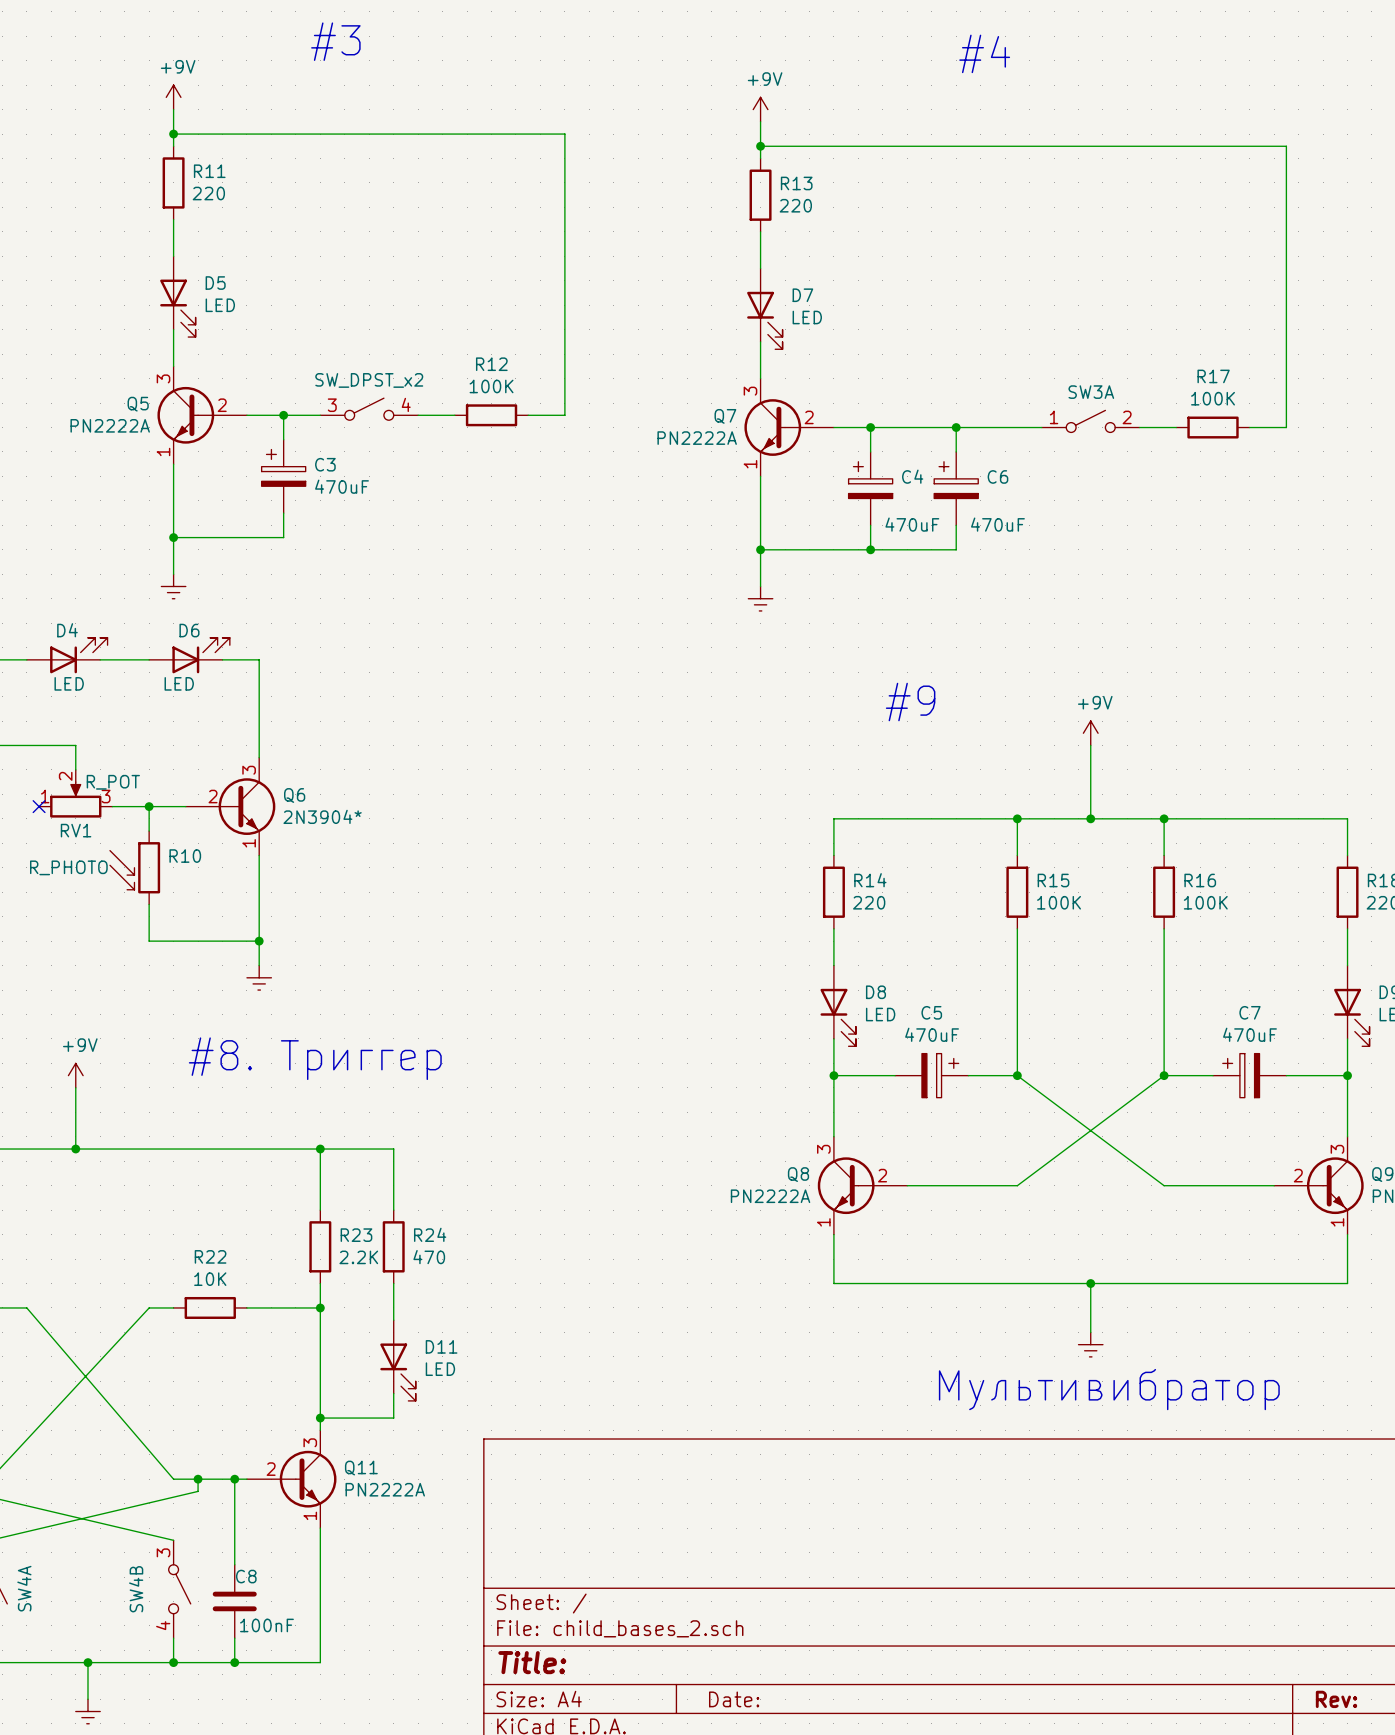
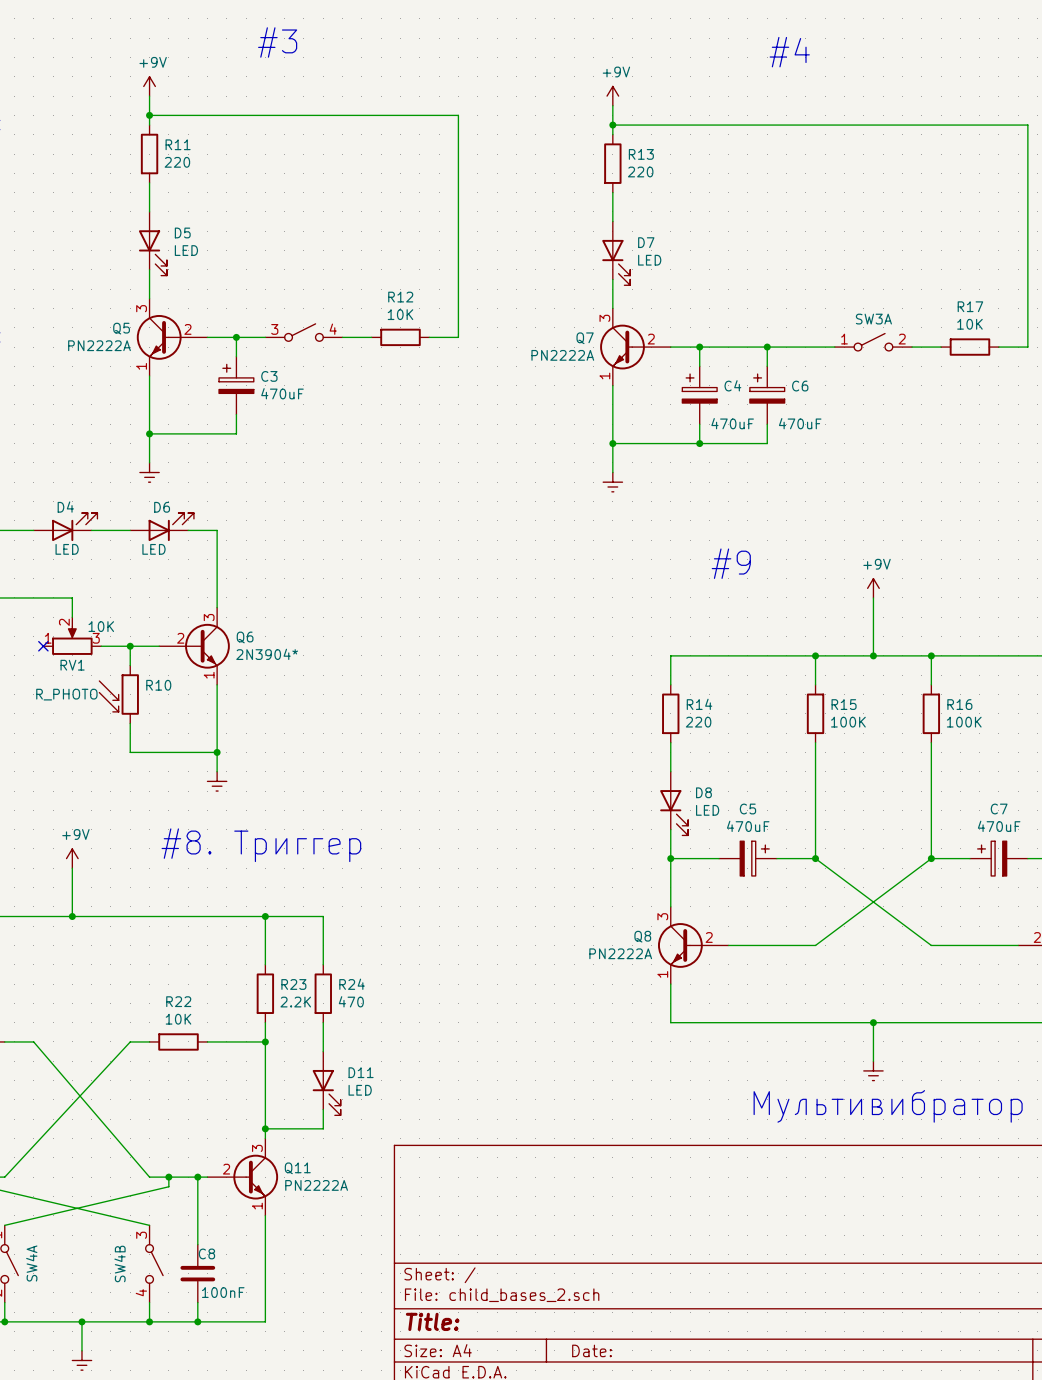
part value: SW_DPST_x2 (369, 380) -> none
R12 value: 100K (491, 386) -> 10K (400, 314)
R17 value: 100K (1213, 398) -> 10K (969, 324)
RV1 value: R_POT (113, 782) -> 10K (101, 626)

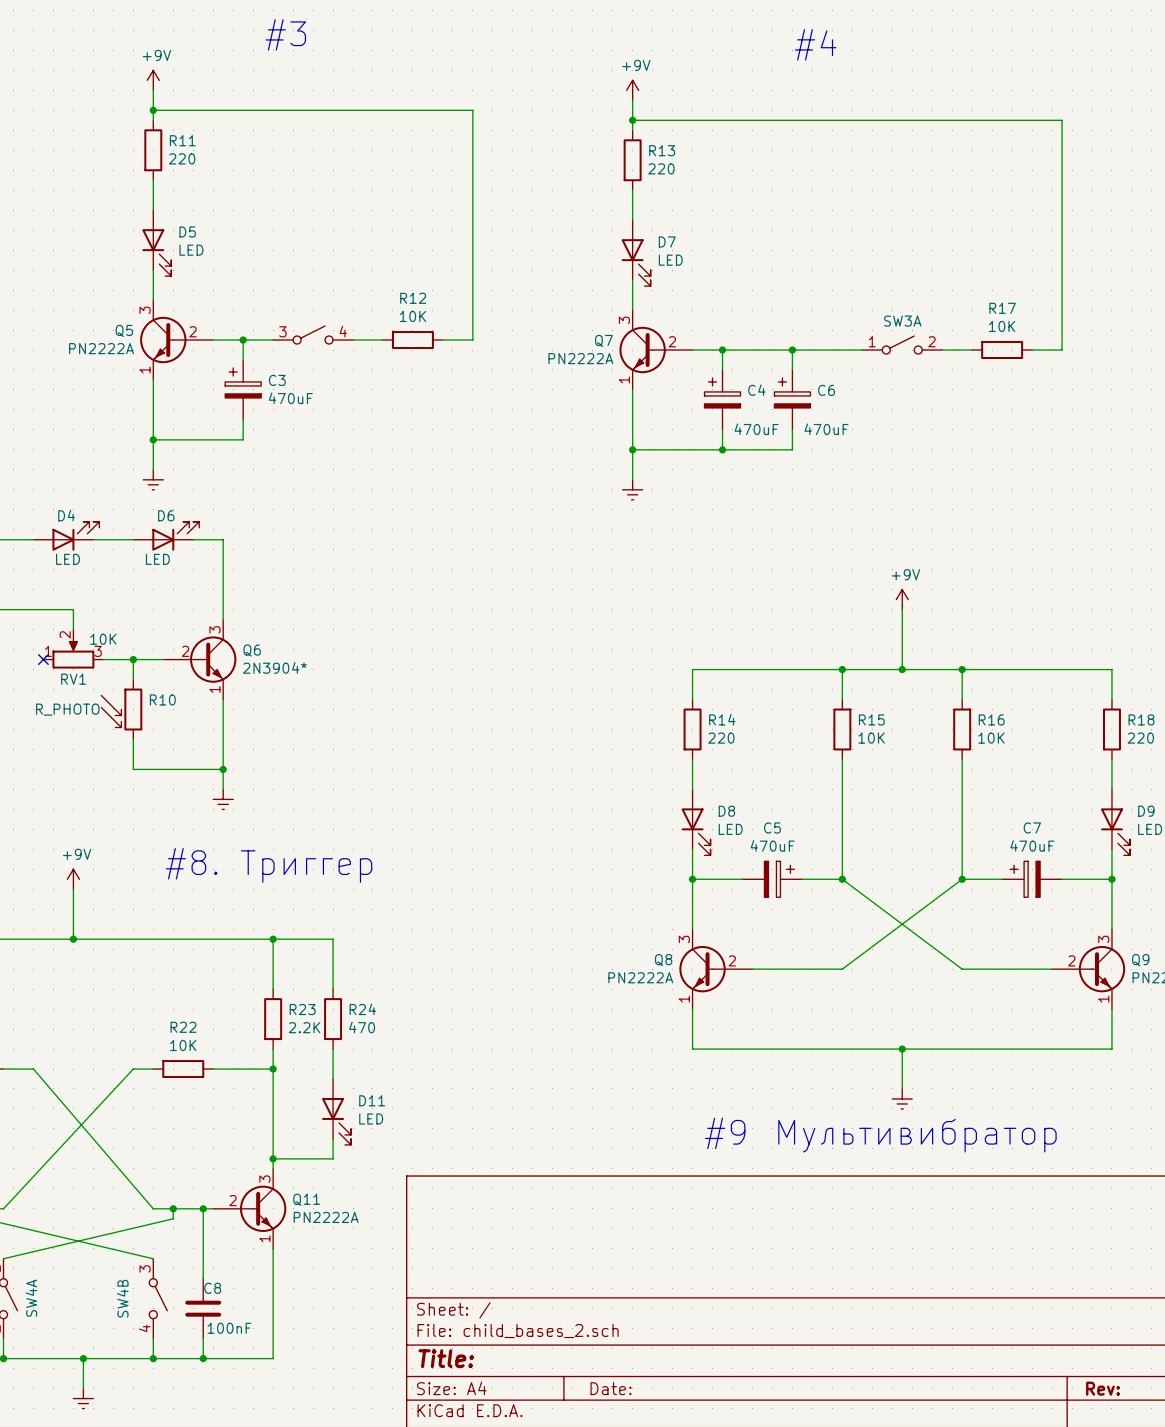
text: #9 (731, 563) -> none
R15 value: 100K (848, 722) -> 10K (871, 738)
R16 value: 100K (964, 722) -> 10K (991, 738)
text: none -> #9 (725, 1133)

